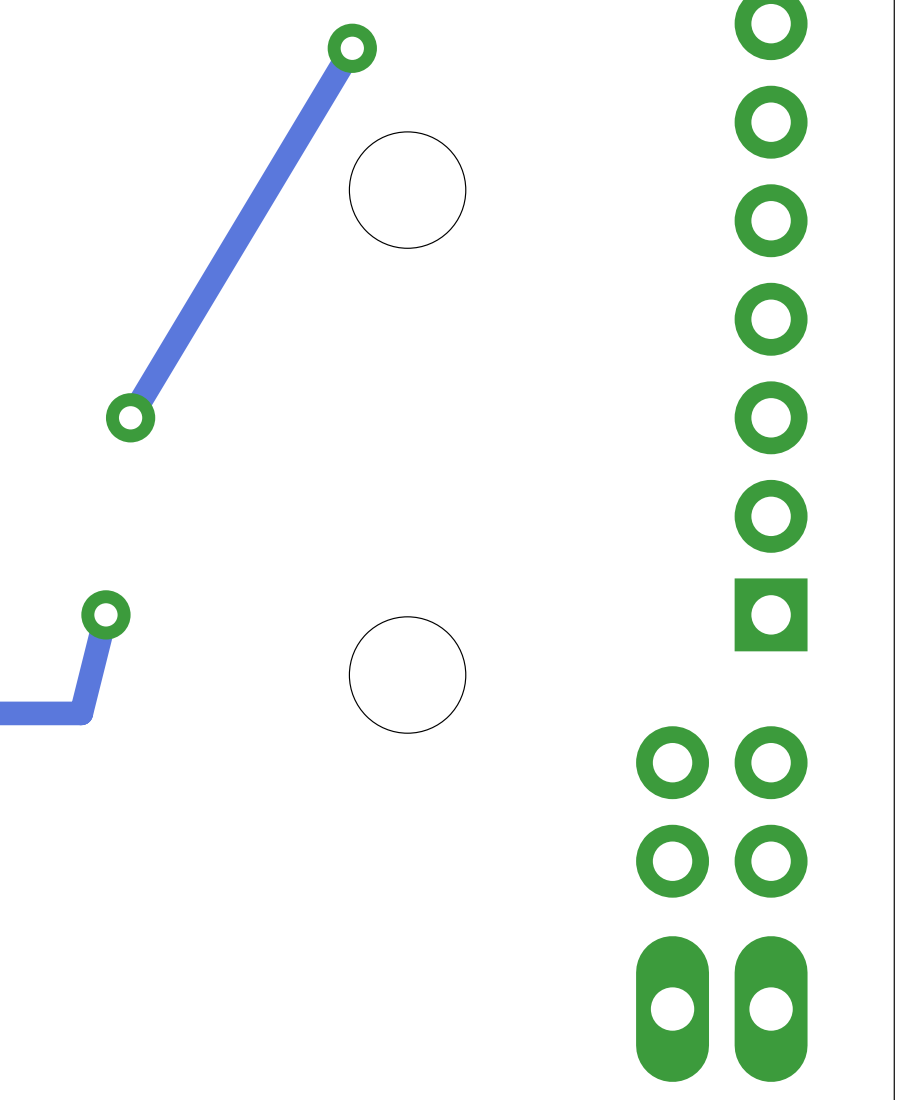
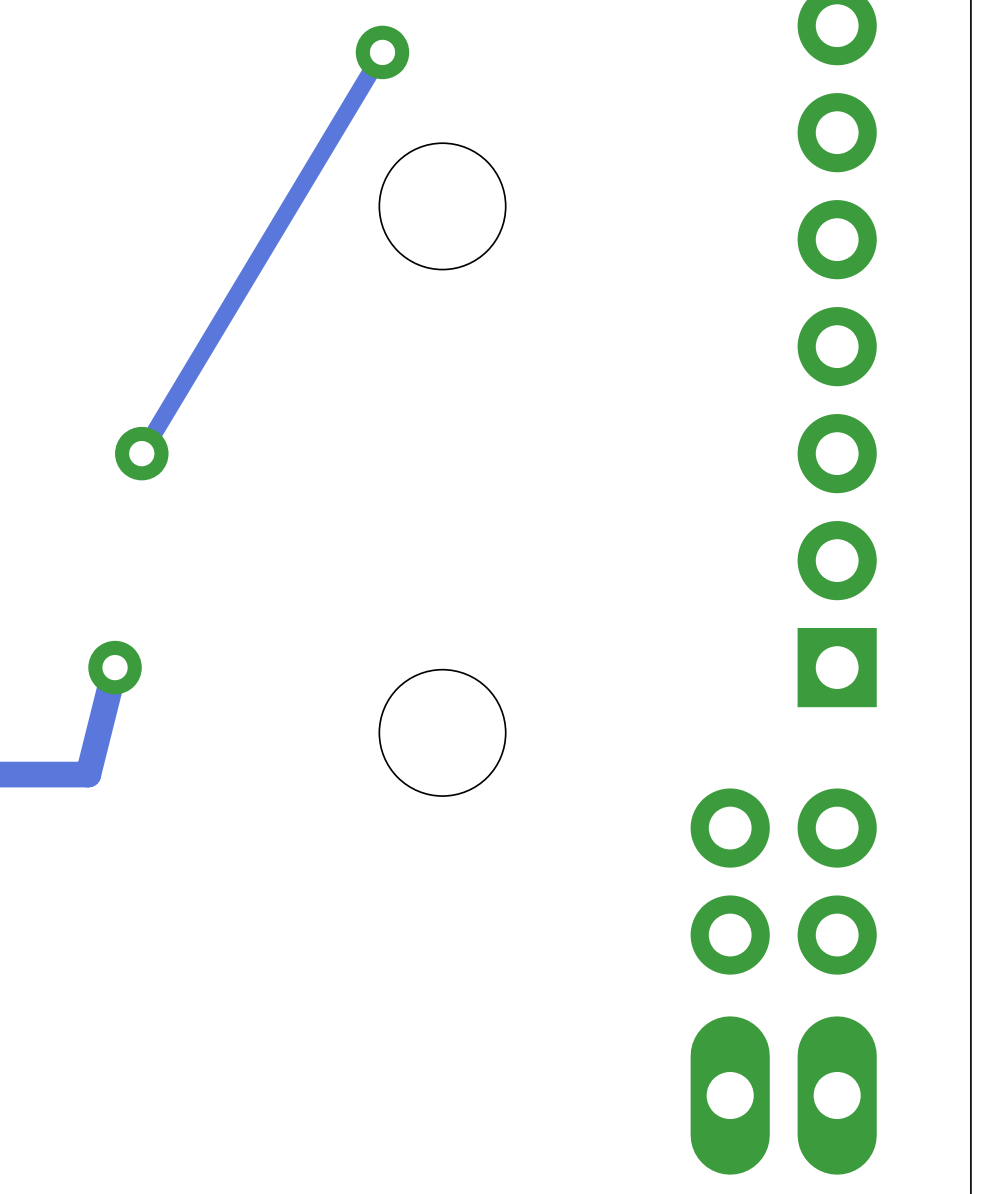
track width: thick (352, 48) (130, 417) -> thin (382, 52) (141, 453)

